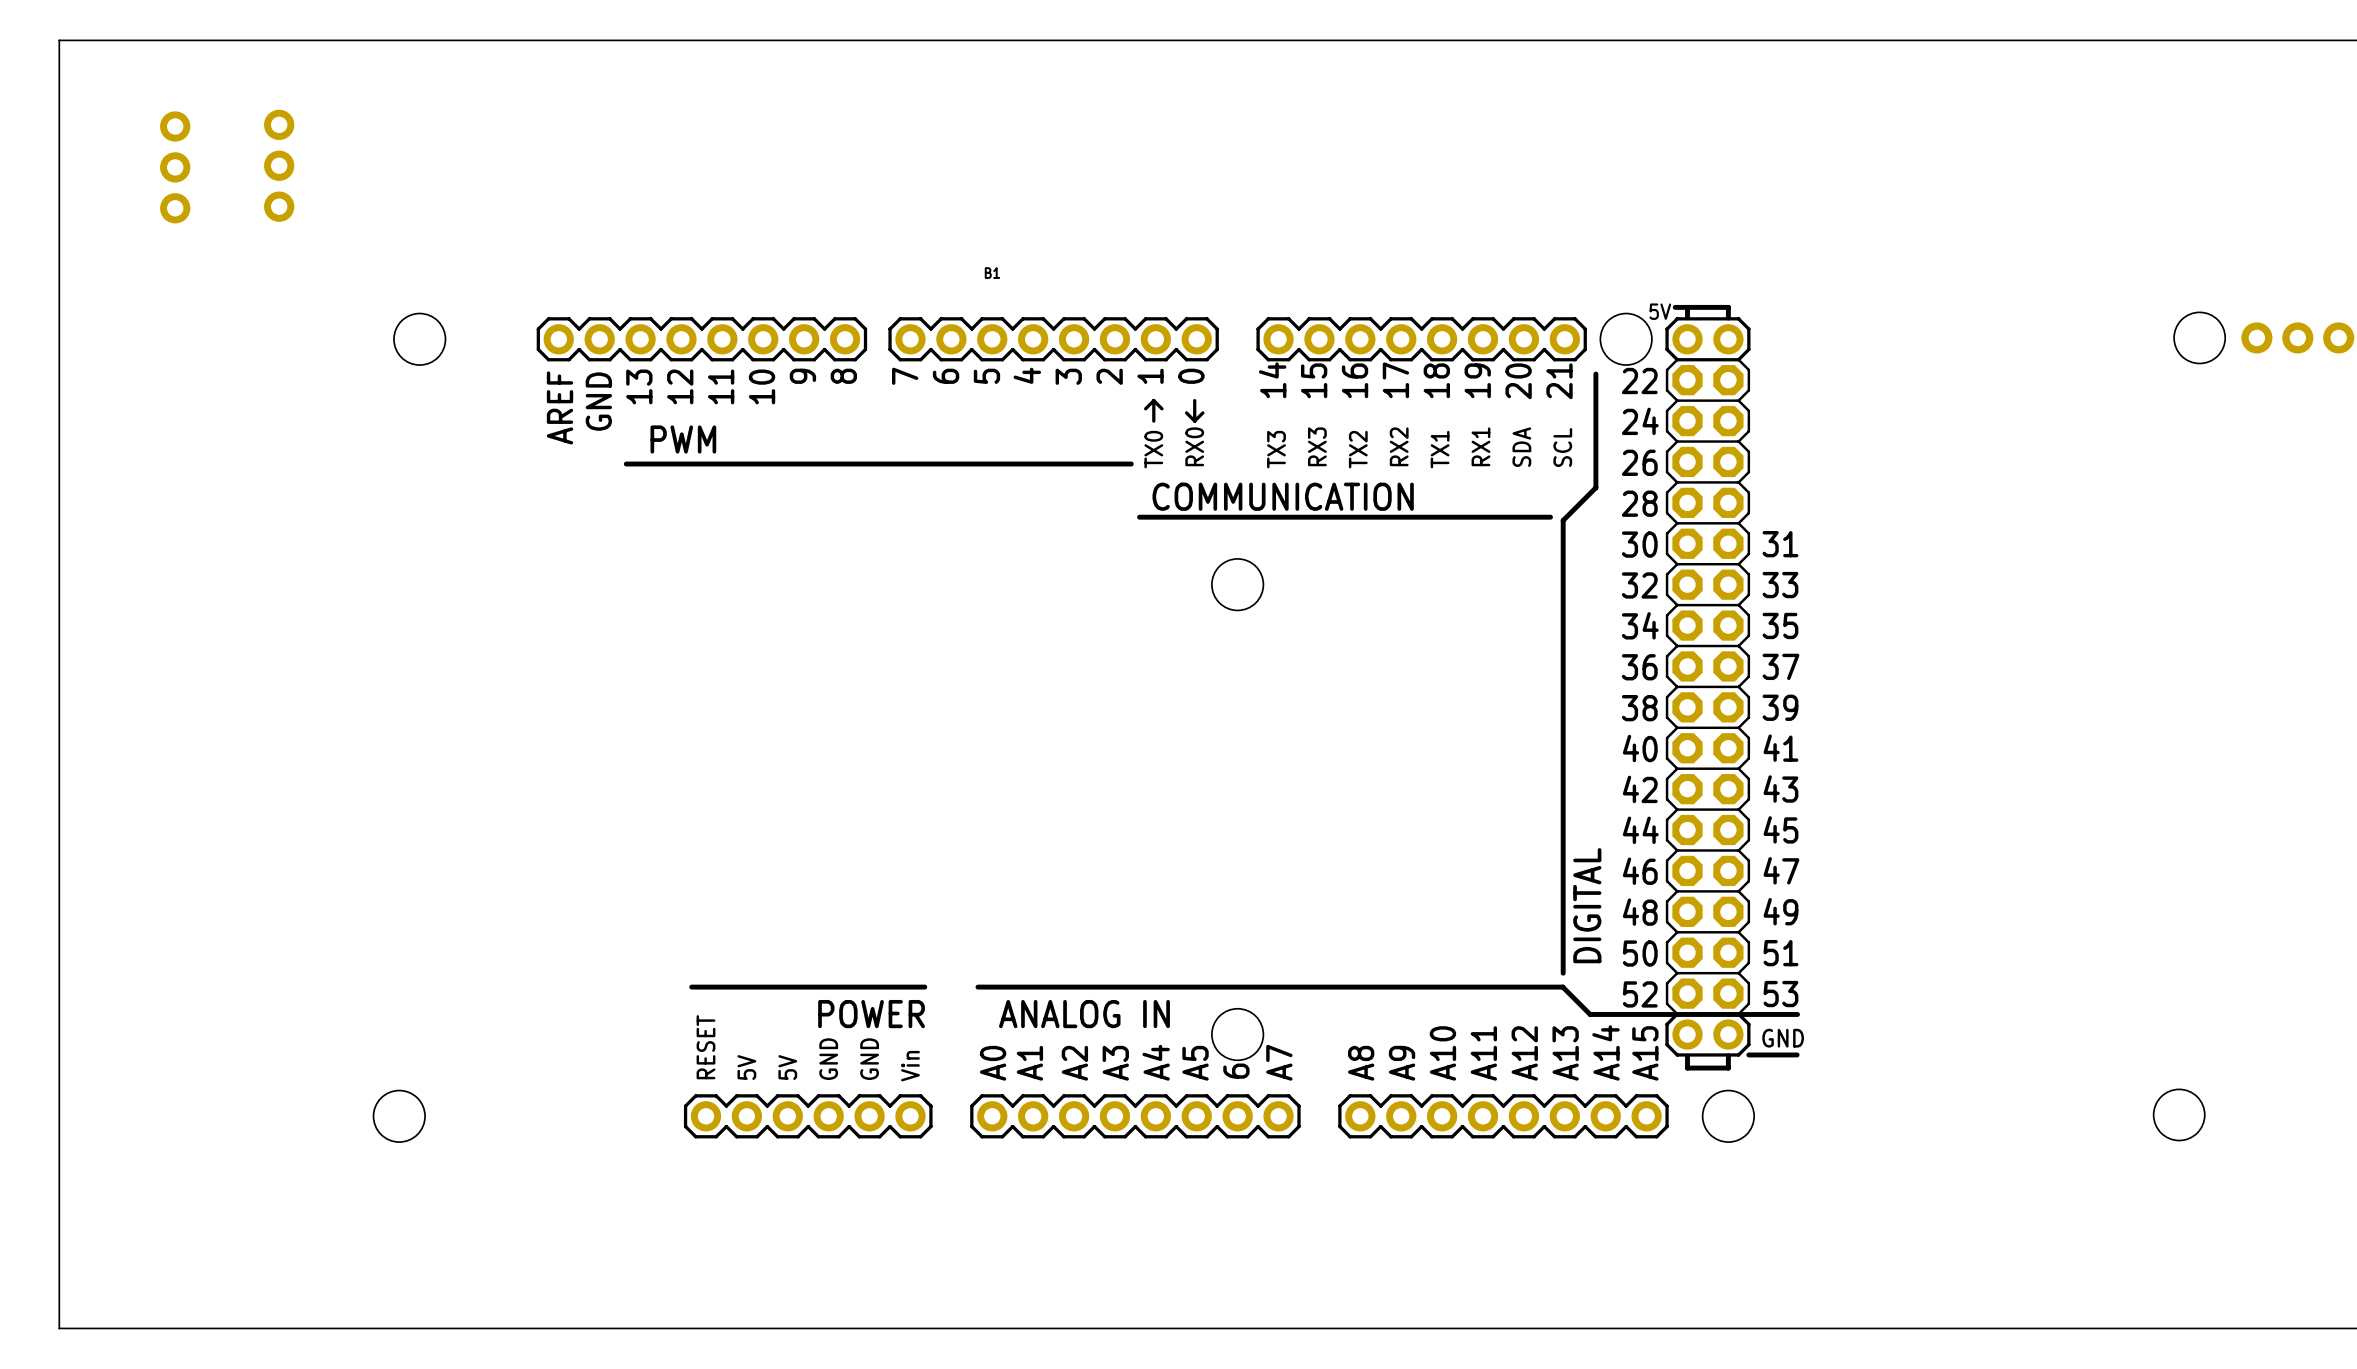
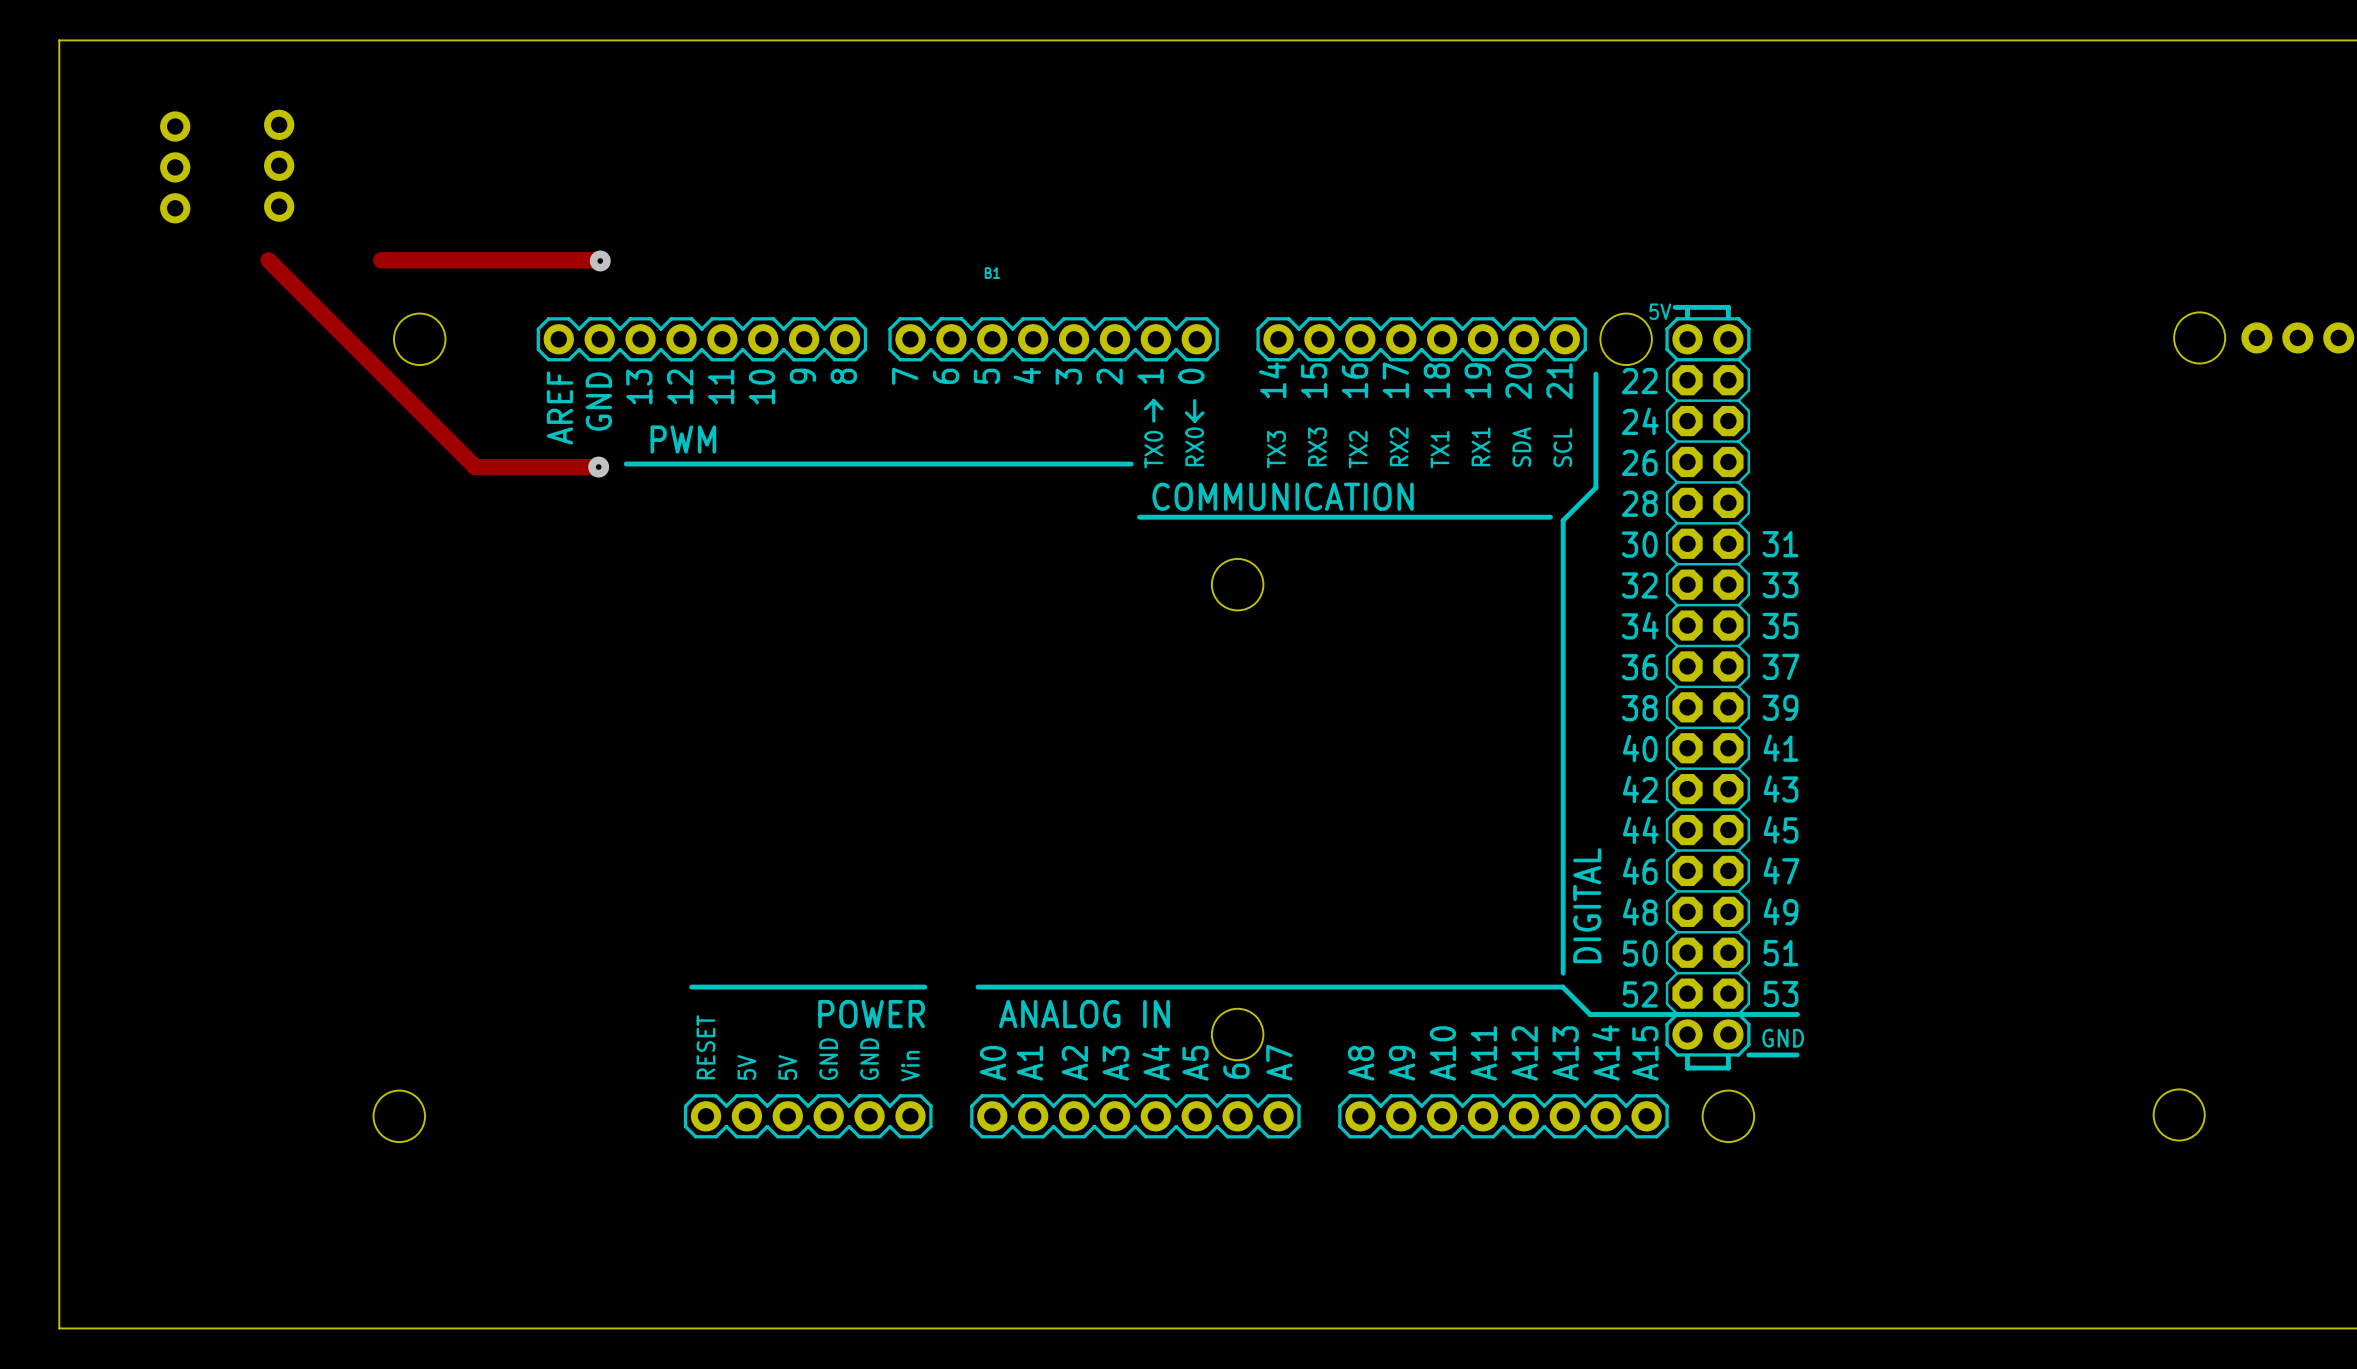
track: none -> (268, 260) (475, 467) (598, 467)
track: none -> (381, 260) (600, 260)
via: none -> (600, 260)
via: none -> (598, 467)

